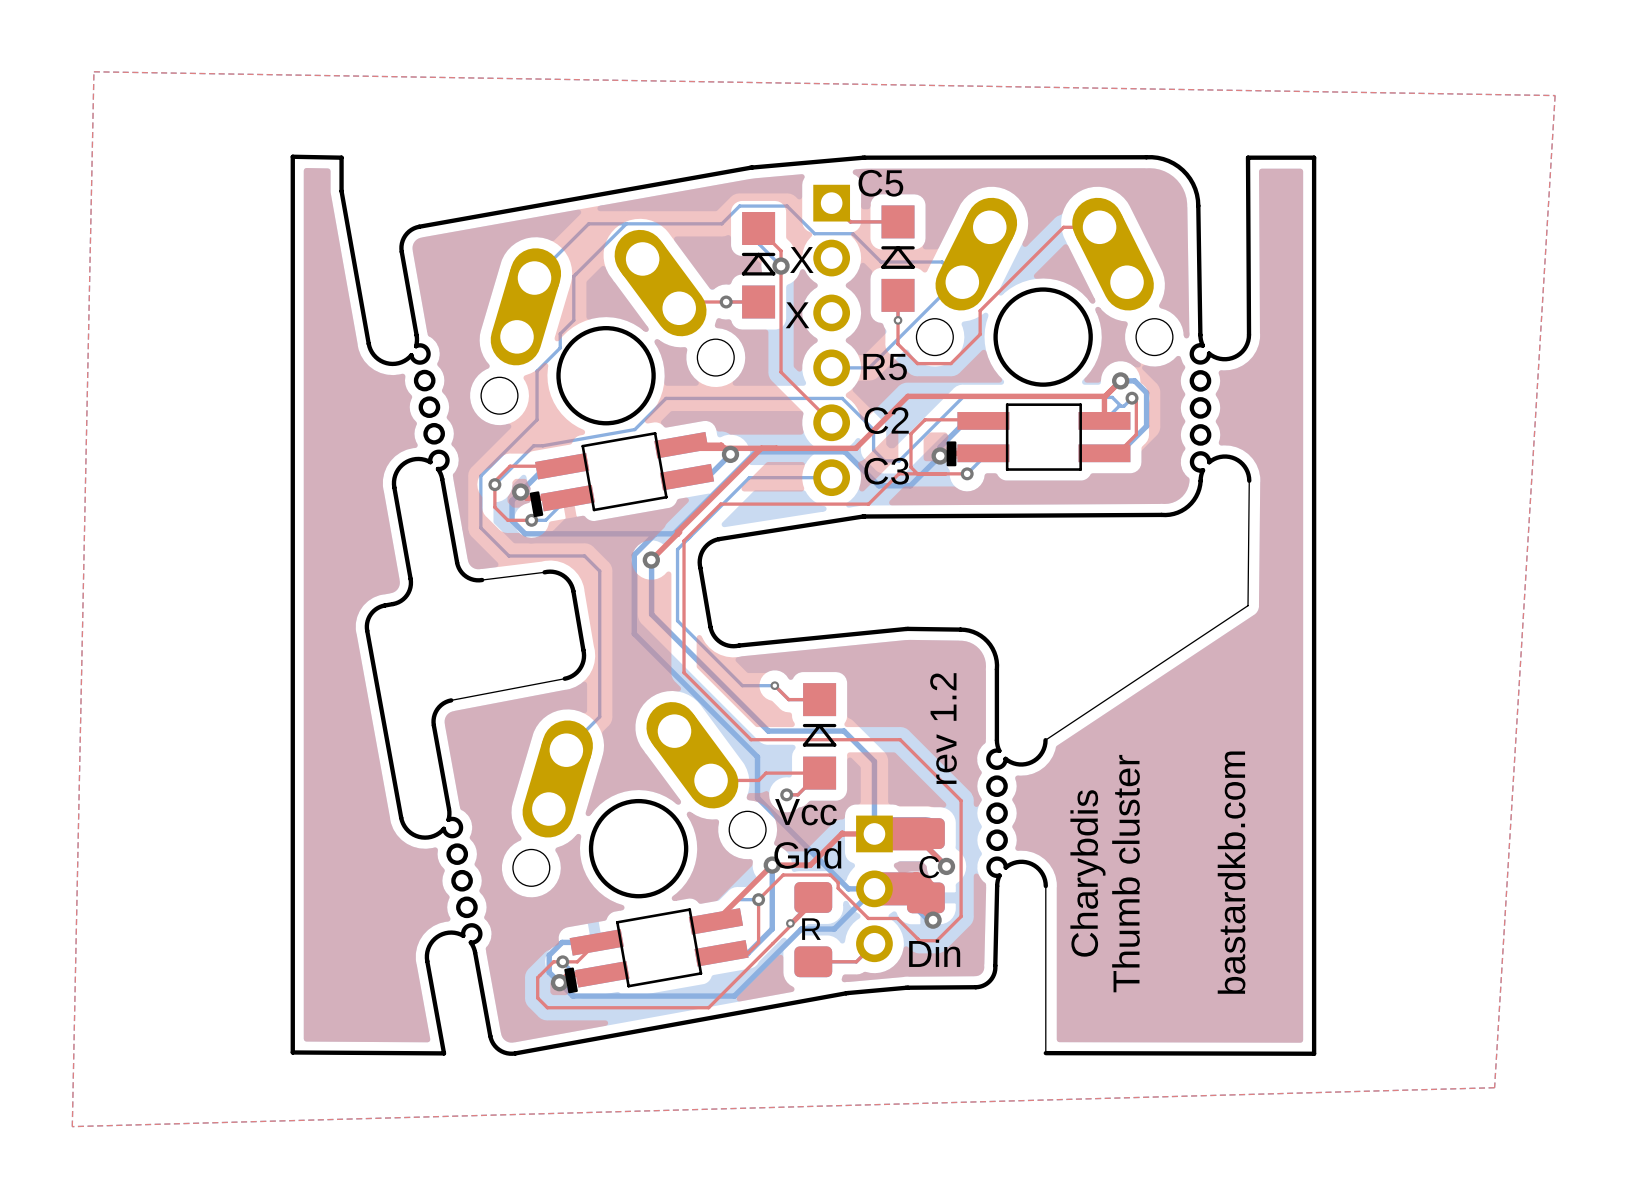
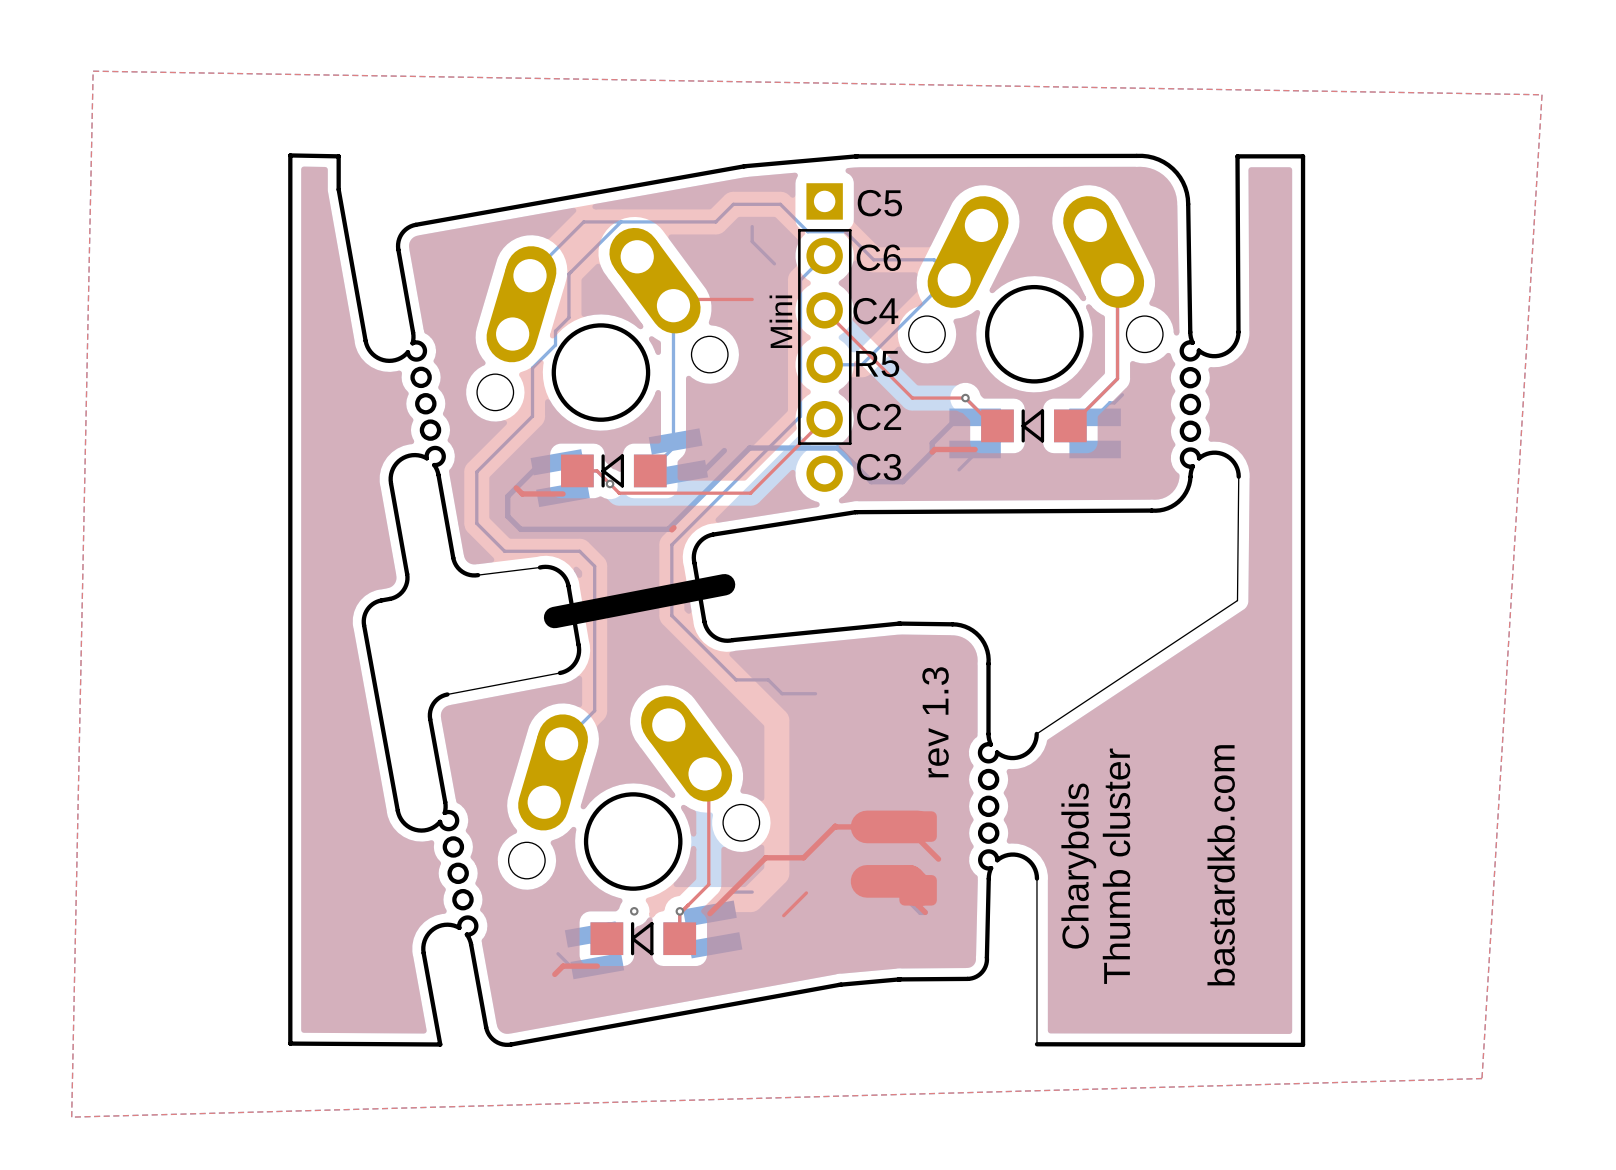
text position: C5 (880, 183) -> C5 (879, 203)
top track: (831, 203) (850, 221) (898, 221) -> none
top track: (1099, 227) (1063, 227) (980, 310) (980, 334) (950, 363) (917, 363) (898, 344) (898, 295) -> none
top track: (758, 228) (781, 250) (781, 372) (831, 422) -> (577, 470) (596, 470) (619, 493) (750, 493) (824, 419)
line: none -> (799, 230) (850, 230) (850, 443) (799, 443) (799, 230)
part: (898, 258) -> none
text: none -> C6 (878, 257)
text: X (801, 260) -> none
part: (758, 265) -> none
via: (781, 266) -> none
top track: none -> (1117, 279) (1117, 378) (1070, 425)
via: (726, 302) -> none
bottom track: none -> (673, 305) (673, 447) (650, 470)
top track: none -> (824, 310) (912, 398) (965, 398) (993, 425) (997, 425)
text: none -> C4 (875, 311)
text: X (797, 315) -> Mini (780, 321)
via position: (898, 320) -> (965, 398)
top track: (1120, 380) (1104, 397) (1104, 420) -> none
bottom track: (1120, 380) (1134, 380) (1146, 392) (1146, 426) (1119, 453) (1104, 453) -> none
via: (1120, 380) -> none
top track: (1105, 396) (907, 396) (855, 448) (684, 448) (681, 445) (721, 445) (730, 454) -> none
top track: (1132, 398) (1136, 402) (1136, 434) (1117, 453) (1104, 453) -> none
via: (1132, 398) -> none
part footprint: [946, 403, 1131, 471] -> [981, 409, 1087, 443]
bottom track: (1121, 406) (1112, 397) (962, 397) (899, 460) (884, 460) (873, 450) (873, 429) (842, 398) (665, 398) (634, 429) (533, 445) (494, 484) -> none
top track: (983, 420) (925, 419) (910, 433) (910, 467) (917, 473) -> none
part footprint: [529, 431, 715, 518] -> [561, 454, 667, 488]
top track: (761, 448) (651, 560) -> none
via: (730, 454) -> none
via: (940, 455) -> none
top track: (562, 466) (510, 466) (494, 481) (494, 507) (507, 520) (531, 520) -> none
top track: (967, 473) (898, 473) (868, 504) (720, 504) (684, 540) (684, 672) (751, 739) (900, 739) (961, 800) (961, 916) (936, 940) (919, 940) (897, 918) (868, 918) (838, 888) (838, 882) (830, 875) (783, 875) (758, 899) (758, 942) (747, 953) (721, 953) -> none
via: (967, 473) -> none
bottom track: (749, 477) (831, 477) -> (743, 473) (800, 416) (800, 280) (824, 255)
via: (494, 484) -> none
via: none -> (610, 483)
via: (520, 492) -> none
bottom track: (567, 498) (545, 520) (531, 520) -> none
via: (531, 520) -> none
bottom track: (655, 533) (634, 554) (634, 633) (757, 757) (757, 797) (848, 888) (874, 888) -> none
bottom track: (651, 560) (651, 614) (768, 731) (843, 731) (874, 761) (874, 833) -> none
via: (651, 560) -> none
line: none -> (724, 584) (554, 617)
top track: (774, 685) (788, 699) (819, 699) -> none
via: (774, 685) -> none
text: rev 1.2 (943, 728) -> rev 1.3 (935, 722)
part: (819, 736) -> none
top track: (711, 780) (758, 780) (766, 773) (819, 773) (797, 794) (786, 794) -> (705, 773) (708, 777) (708, 884) (679, 913) (679, 938)
via: (786, 794) -> none
text: Vcc (805, 812) -> none
text: Gnd (807, 854) -> none
bottom track: (772, 865) (772, 928) (747, 953) (721, 953) -> none
via: (772, 865) -> none
via: (946, 866) -> none
text: C (929, 867) -> none
bottom track: (874, 888) (834, 929) (801, 929) (734, 996) (572, 996) (549, 972) (549, 955) (562, 942) (596, 942) -> none
part: (874, 888) -> none
top track: (813, 897) (813, 903) (708, 1007) (547, 1007) (537, 998) (537, 977) (553, 961) (577, 961) (596, 942) -> none
via: (758, 899) -> none
part footprint: [564, 908, 749, 994] -> [590, 922, 697, 956]
via: none -> (634, 911)
via: none -> (679, 911)
via: (933, 920) -> none
via: (790, 923) -> none
text: R (811, 929) -> none
part: (813, 929) -> none
top track: (874, 943) (856, 961) (813, 961) -> none
text: Din (934, 953) -> none
via: (562, 961) -> none
via: (559, 982) -> none

